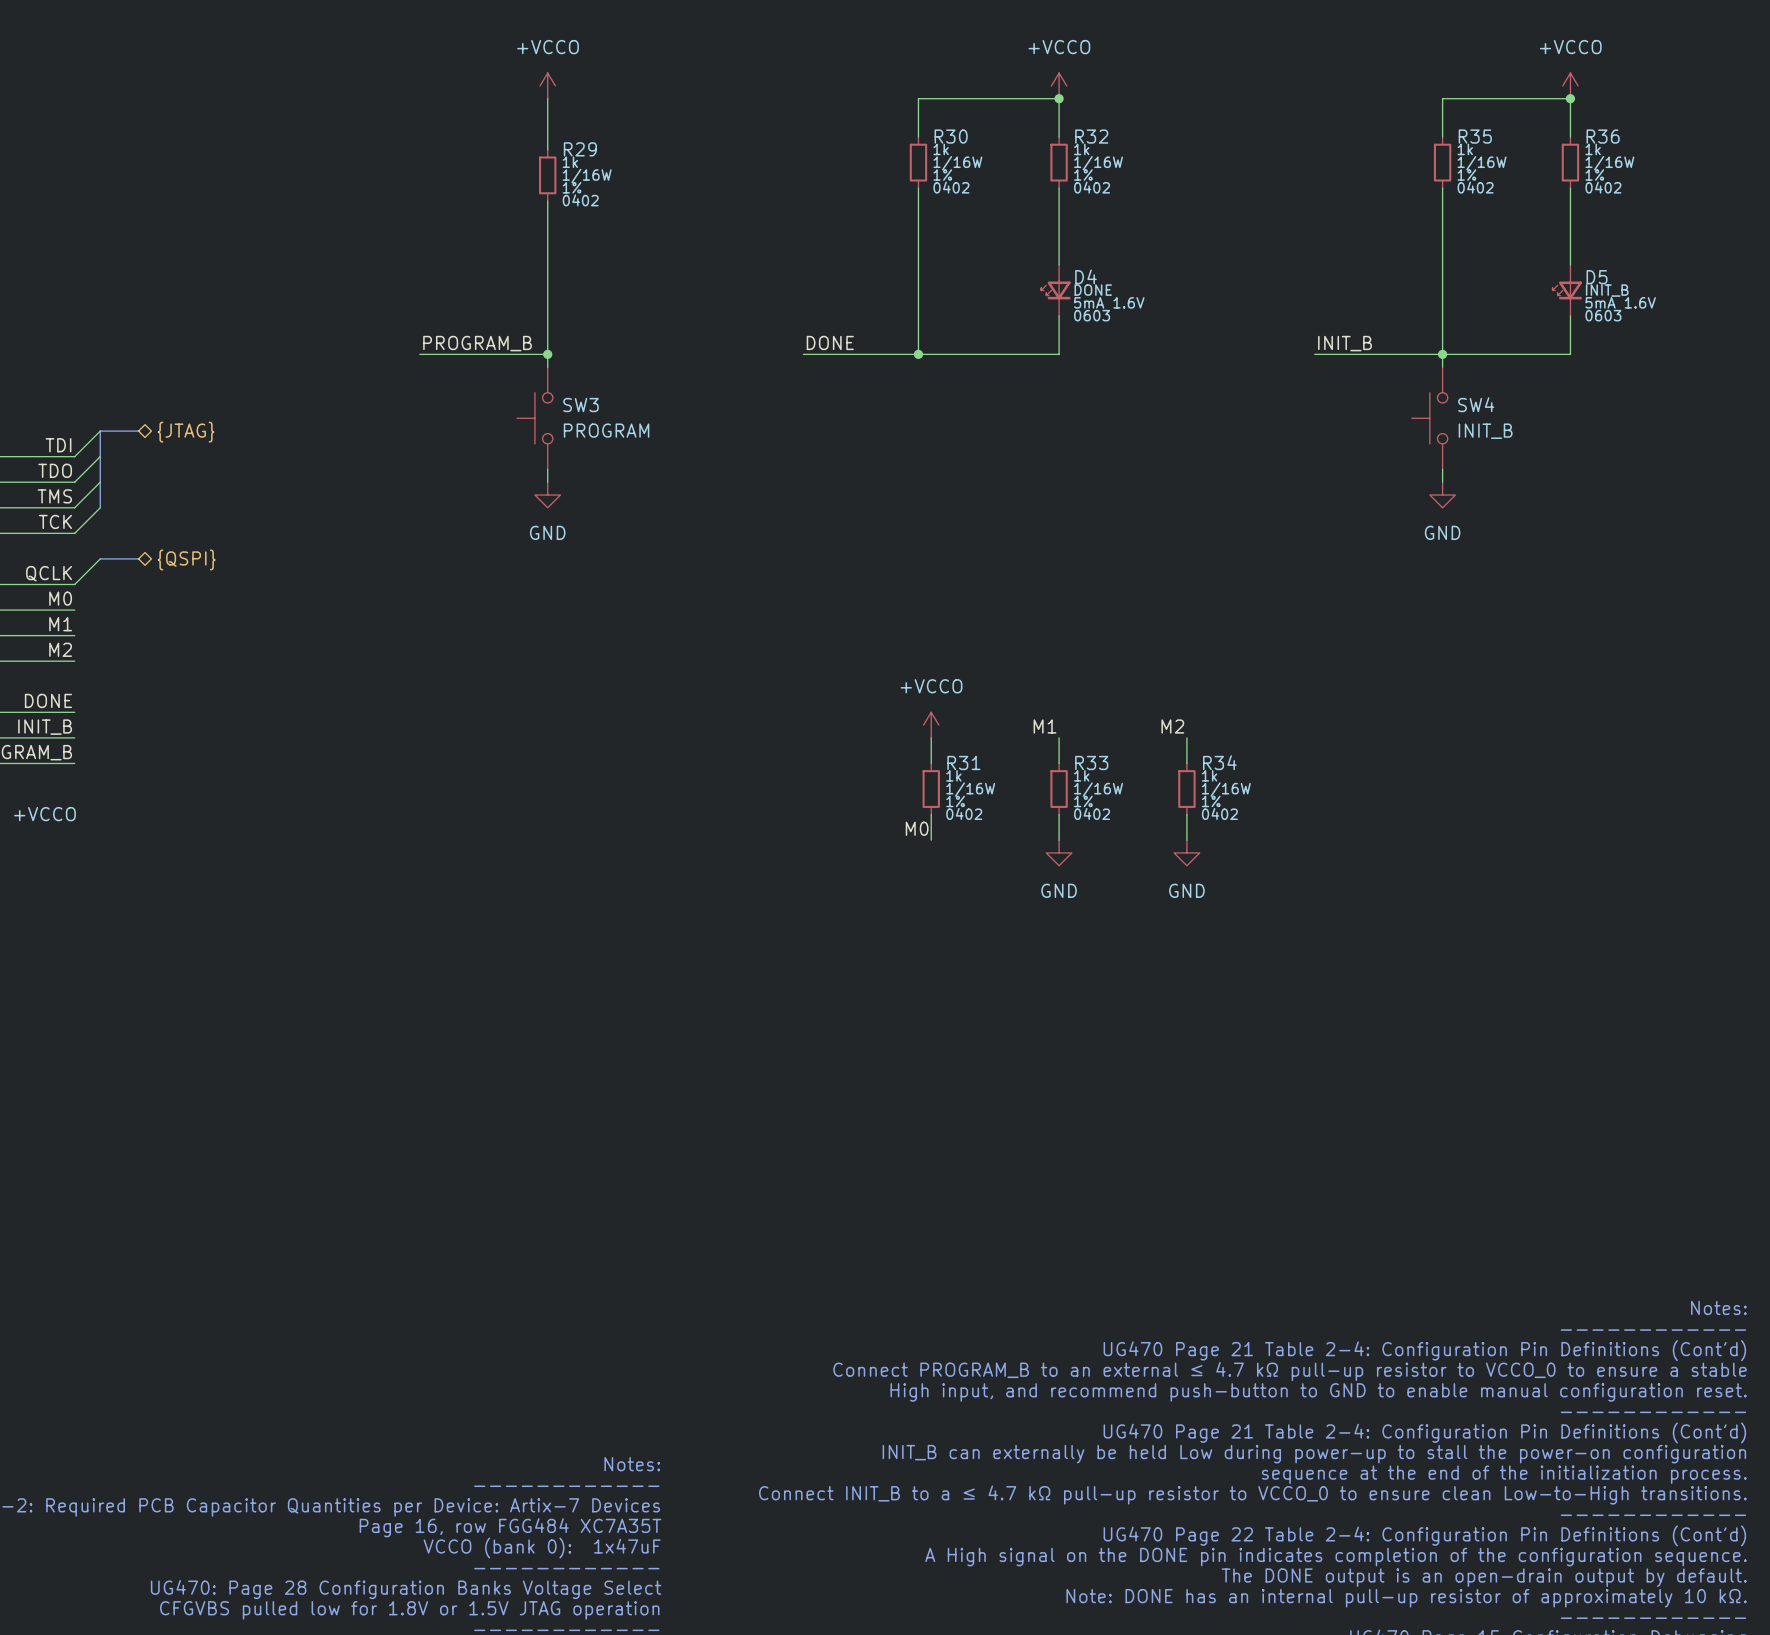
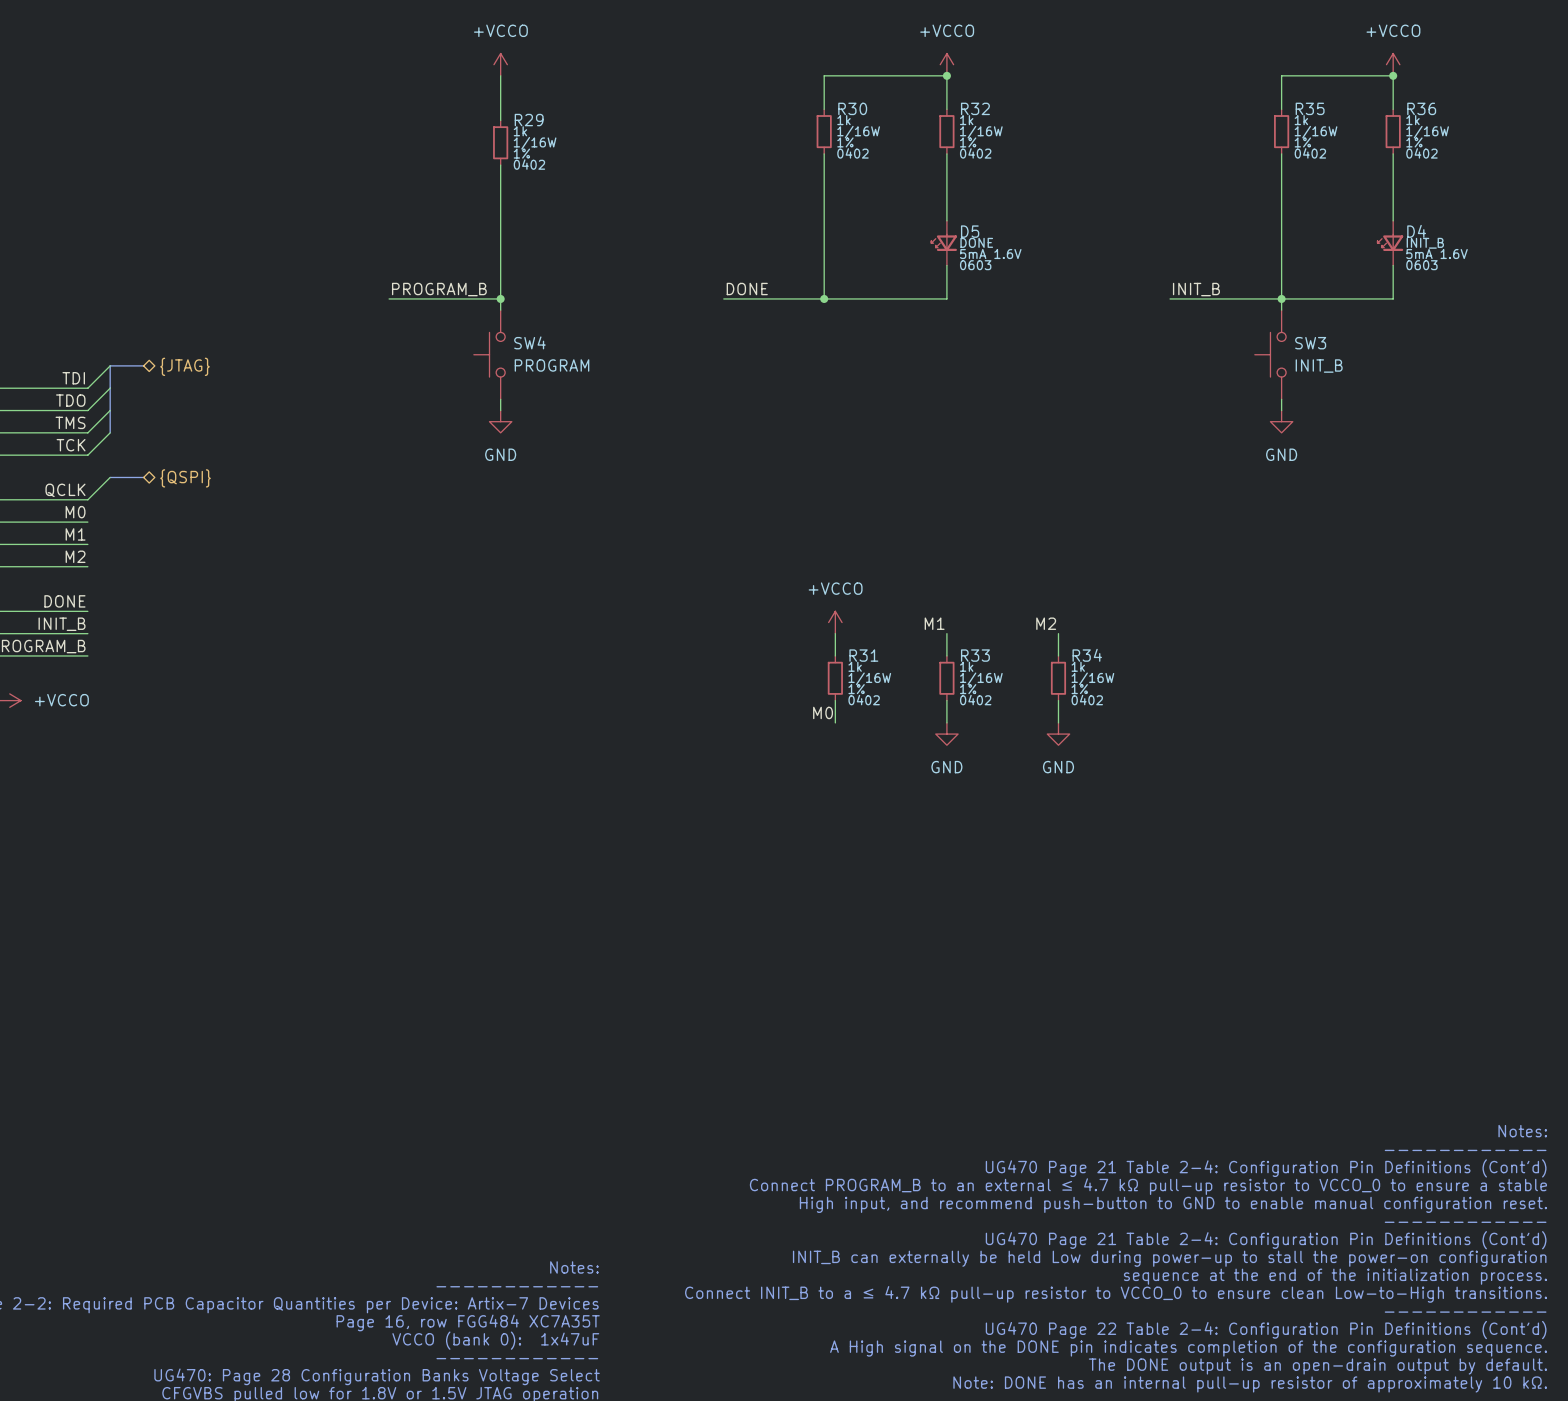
D4 name: D4 (1085, 276) -> D5 (970, 231)
D5 name: D5 (1597, 277) -> D4 (1416, 231)
SW4 name: SW4 (1476, 404) -> SW3 (1310, 343)
SW3 name: SW3 (580, 405) -> SW4 (529, 342)

